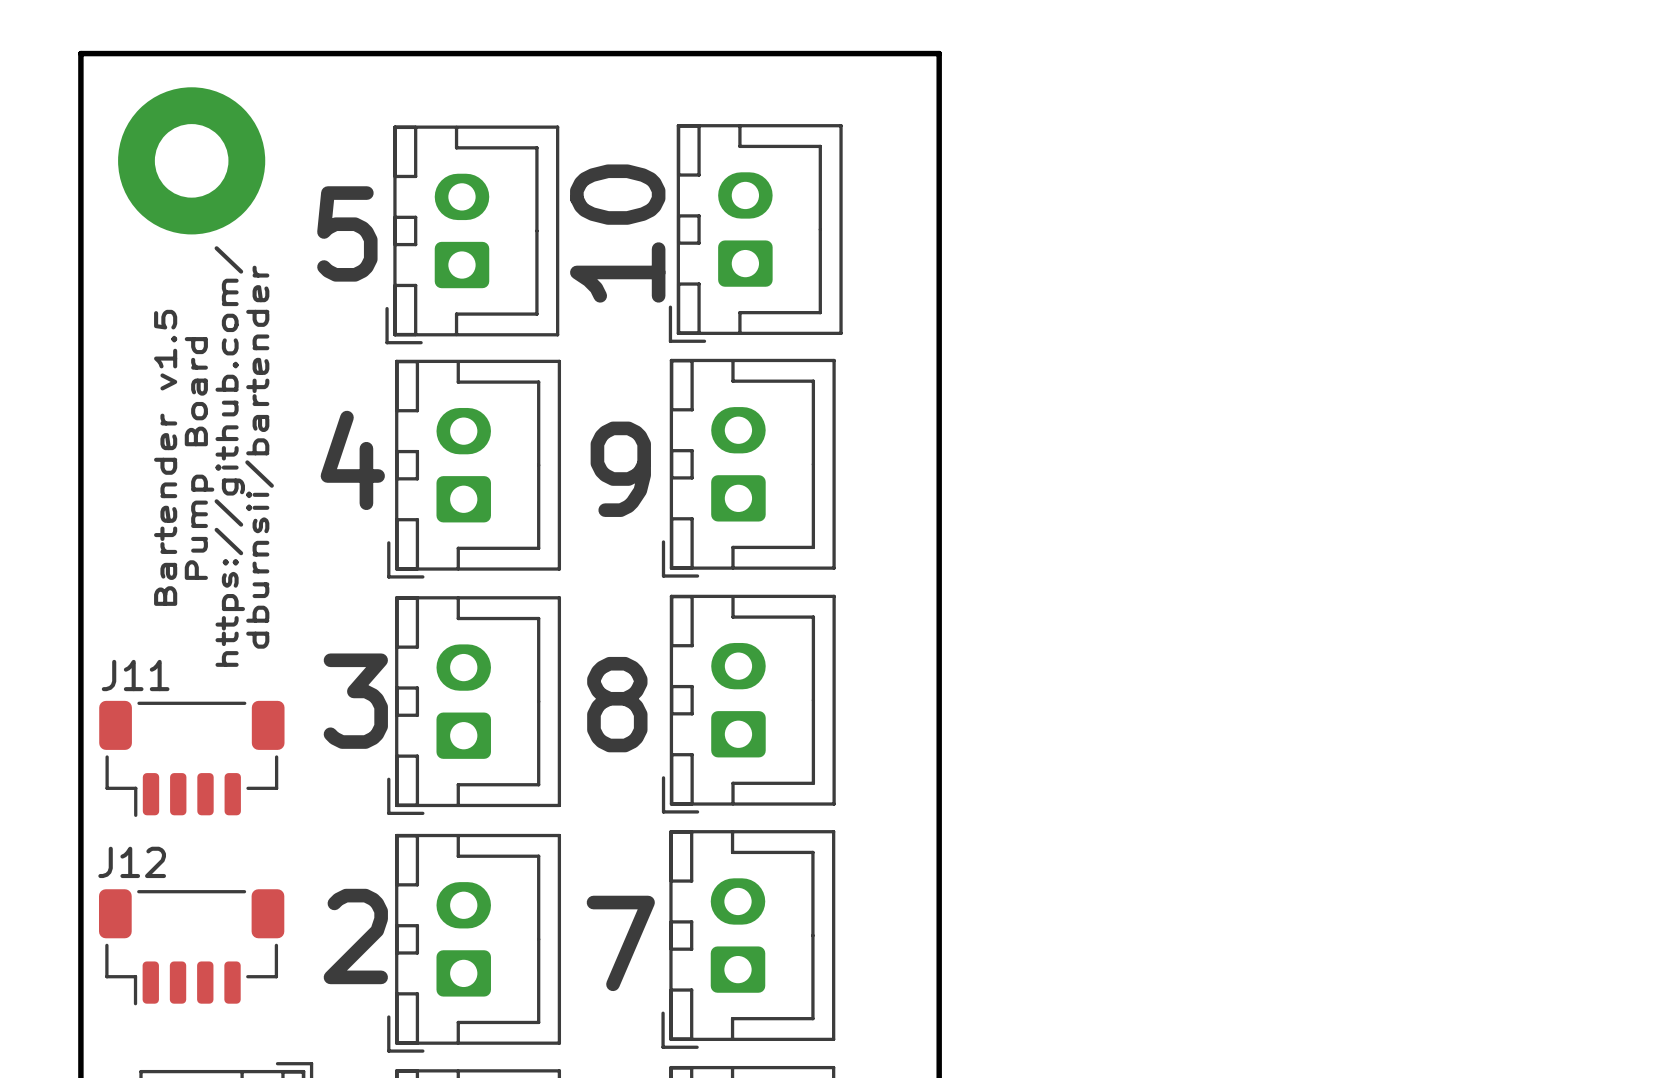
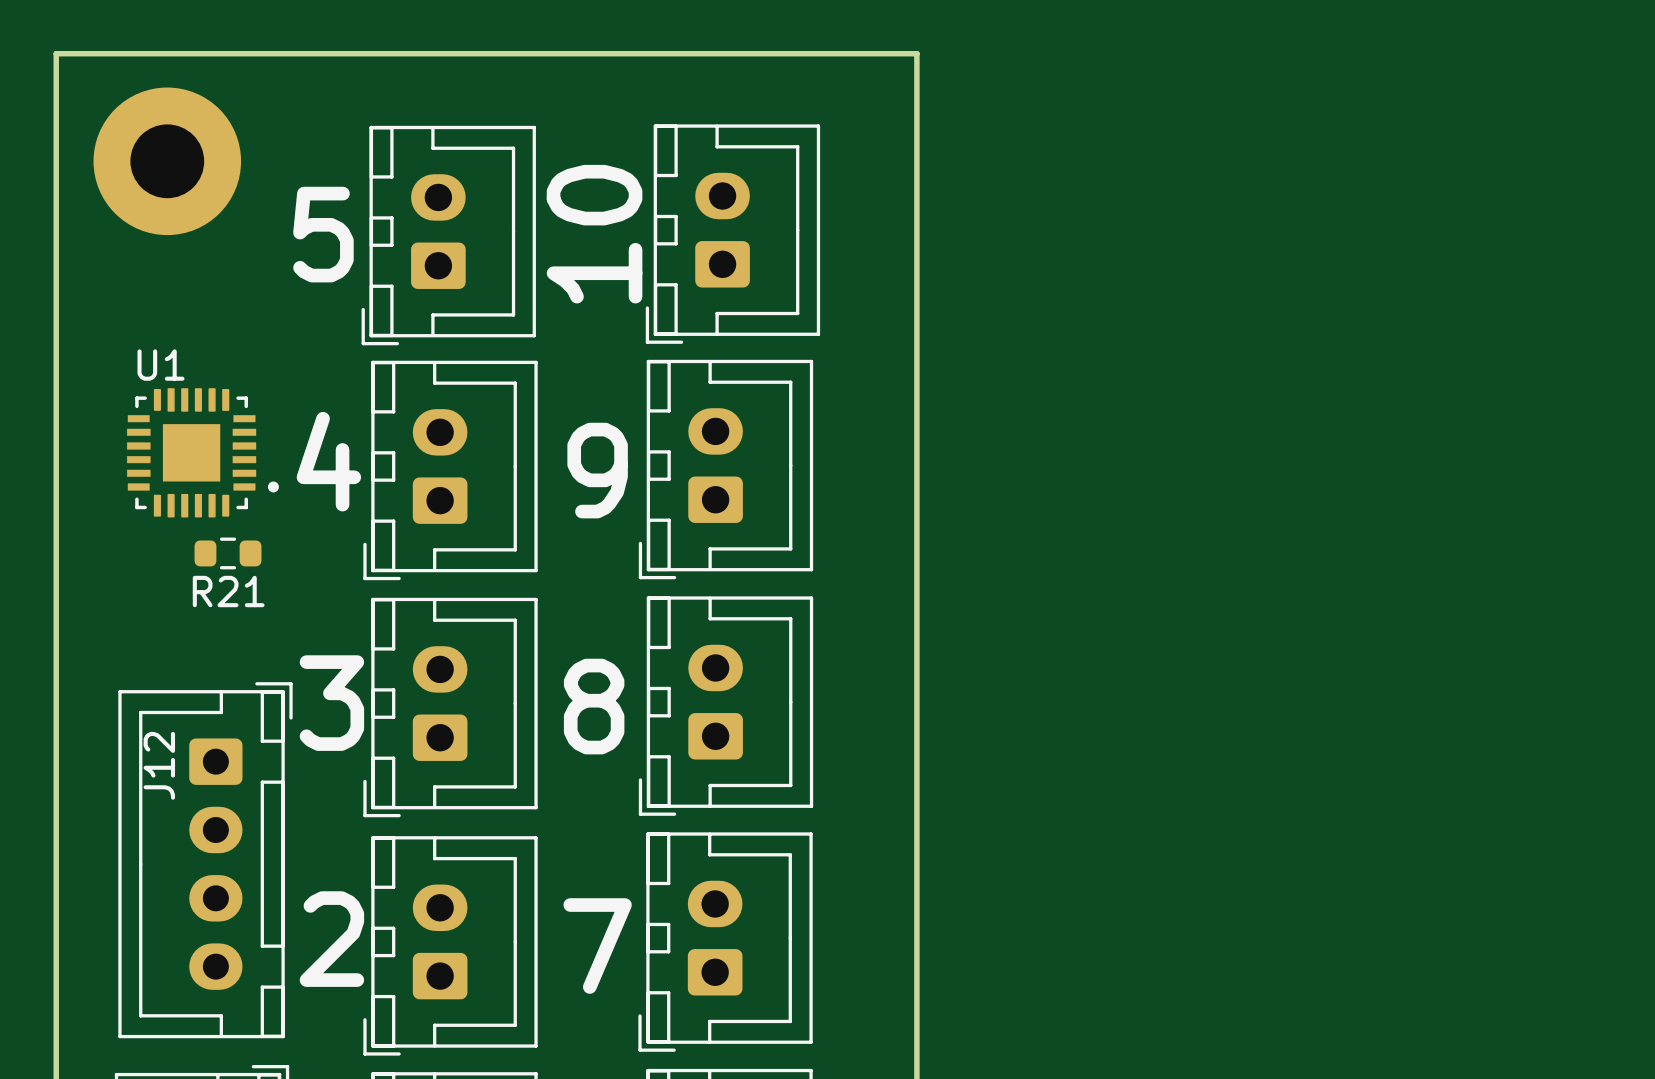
U1: none -> (202, 452)
text: https://github.com/ (229, 456) -> none
text: Bartender v1.5 (165, 457) -> none
text: dburnsii/bartender (259, 457) -> none
text: Pump Board (199, 458) -> none
R21: none -> (228, 553)
J11: (191, 758) -> none
J12 footprint: [99, 889, 285, 1006] -> [118, 682, 293, 1039]

